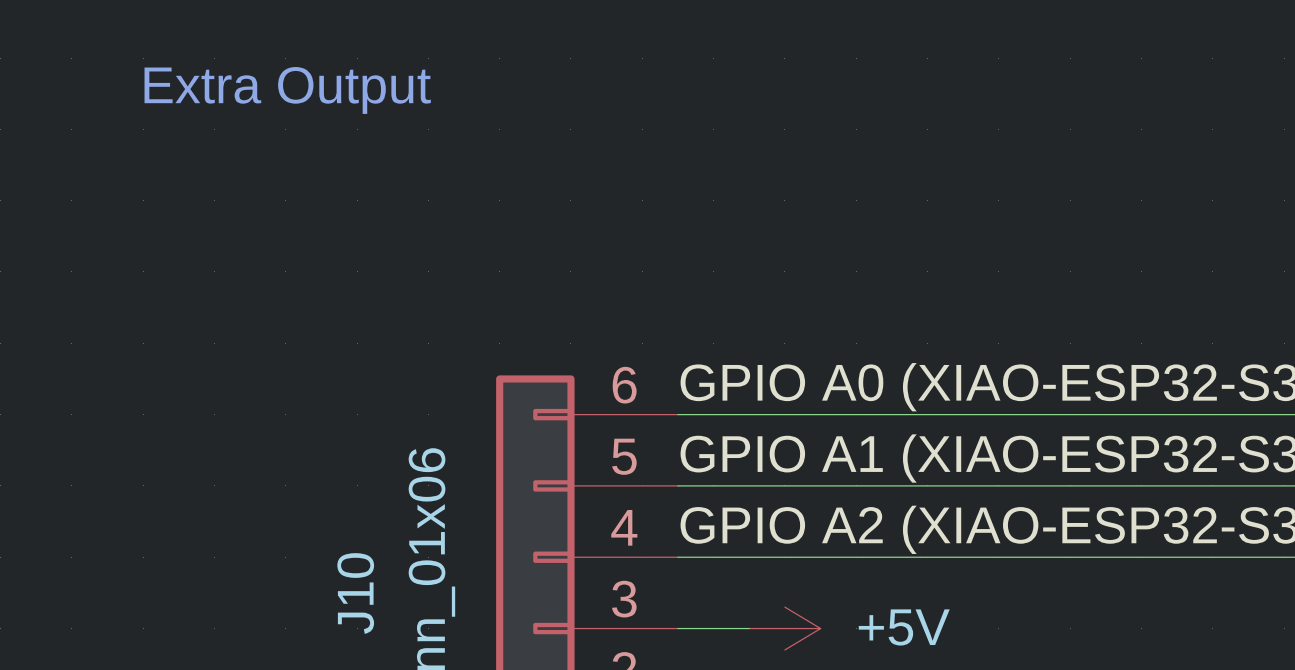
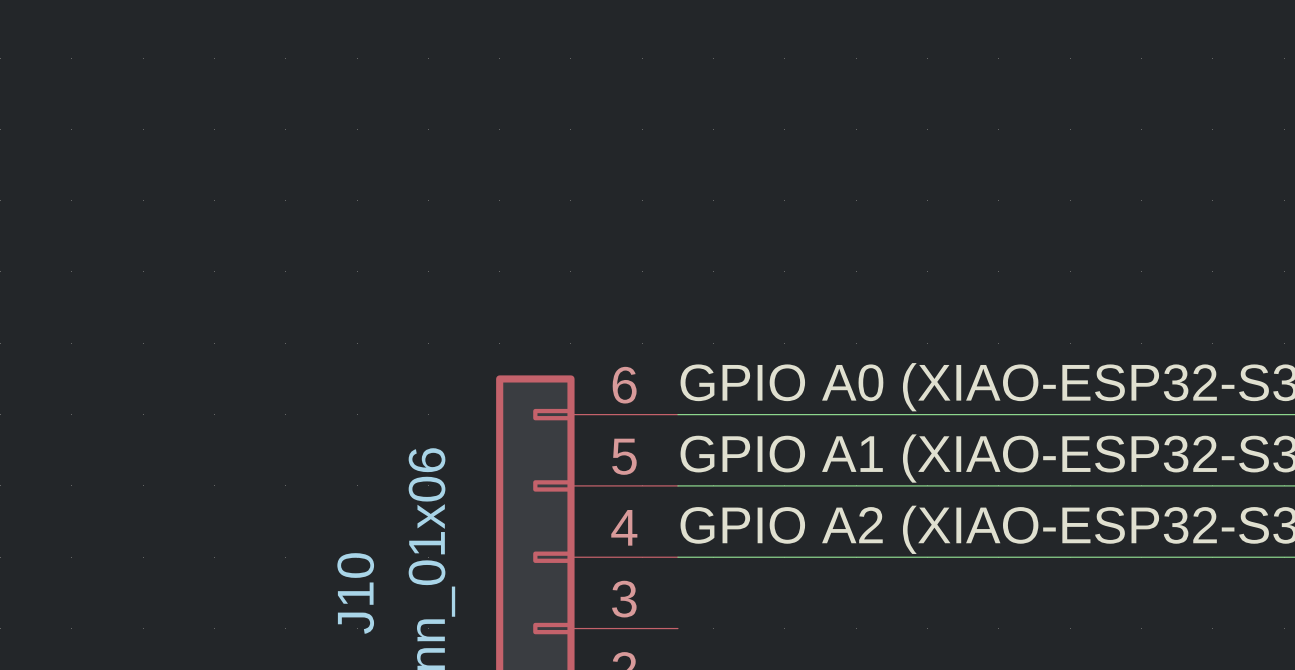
text: Extra Output (287, 90) -> none
wire: (677, 628) (749, 628) -> none
power symbol: +5V (784, 628) -> none

